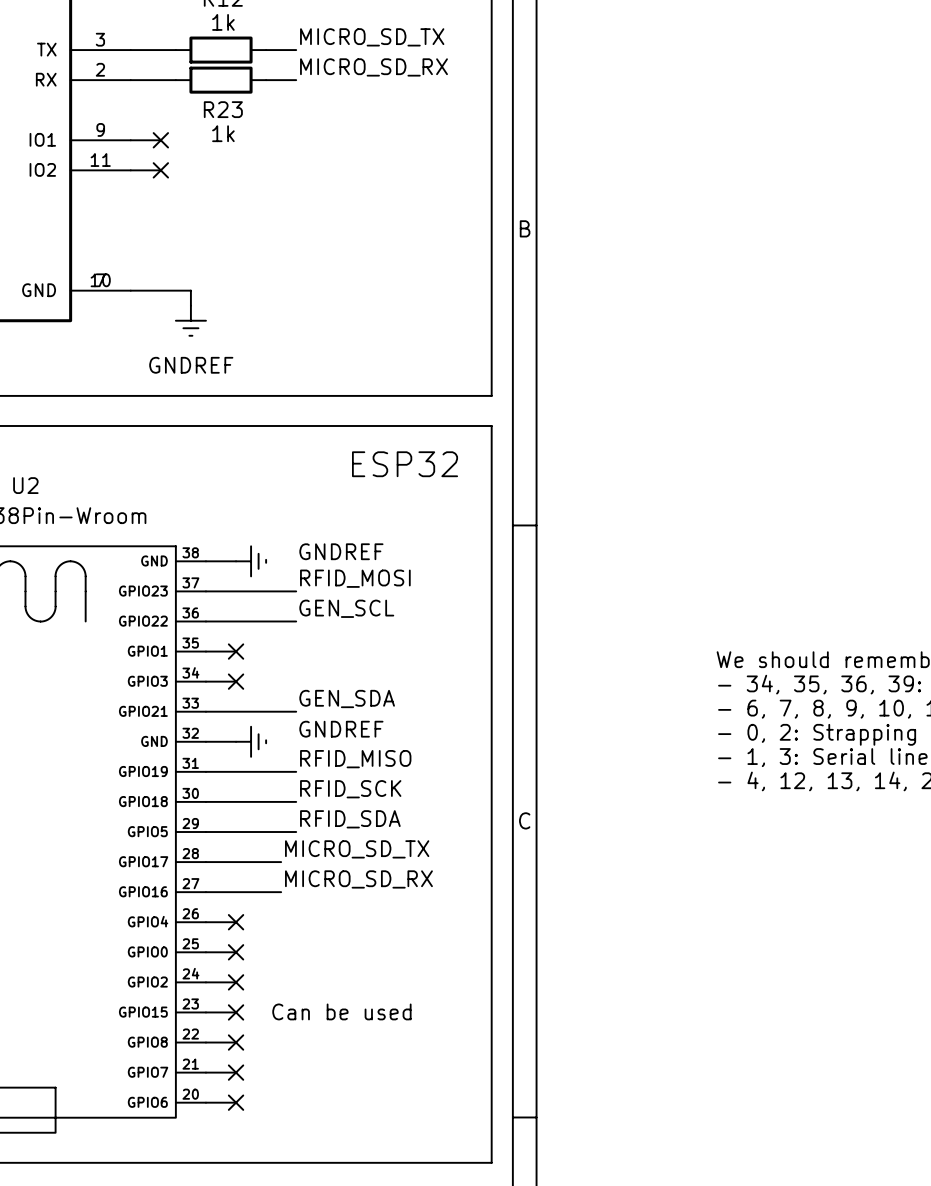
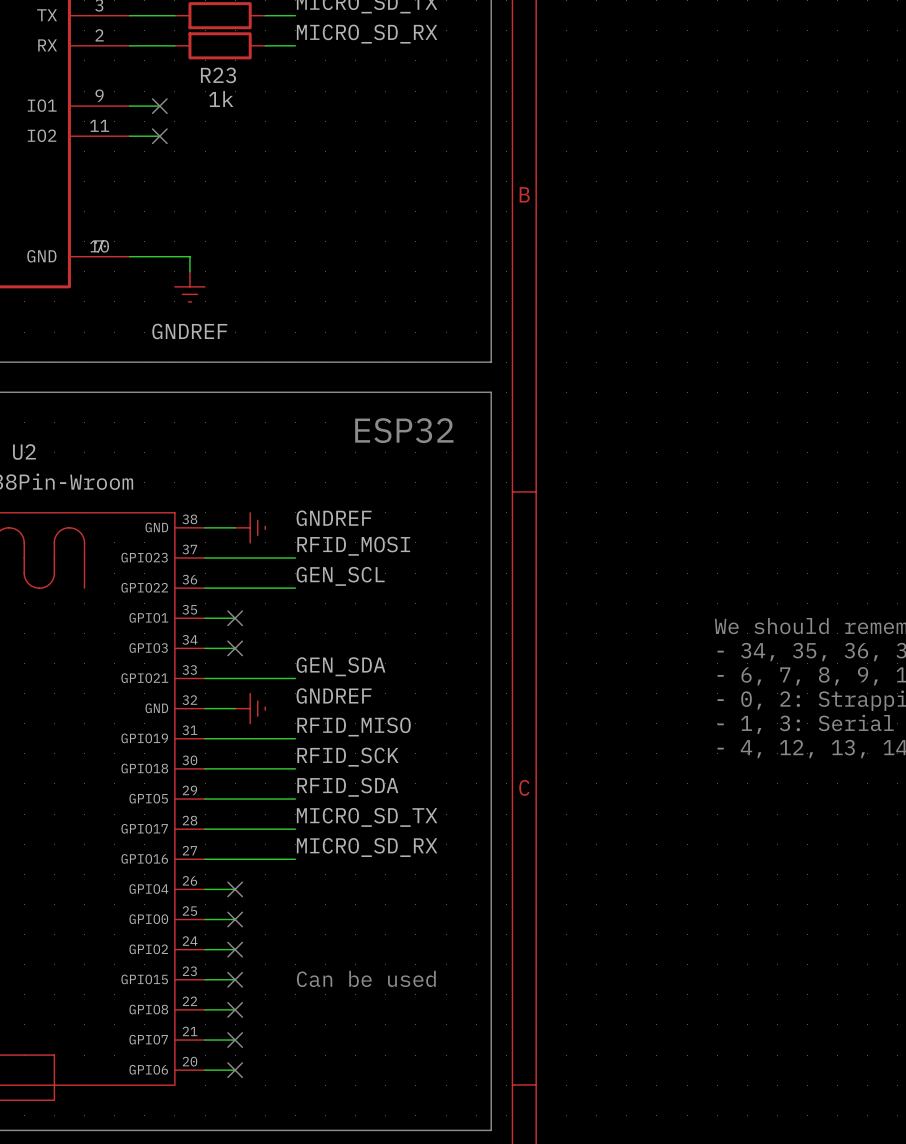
label position: MICRO_SD_TX (357, 849) -> MICRO_SD_TX (367, 817)
wire: none -> (280, 829) (295, 829)
label position: MICRO_SD_RX (358, 879) -> MICRO_SD_RX (367, 847)
wire: none -> (280, 859) (295, 859)
text position: Can be used (341, 1011) -> Can be used (366, 978)

